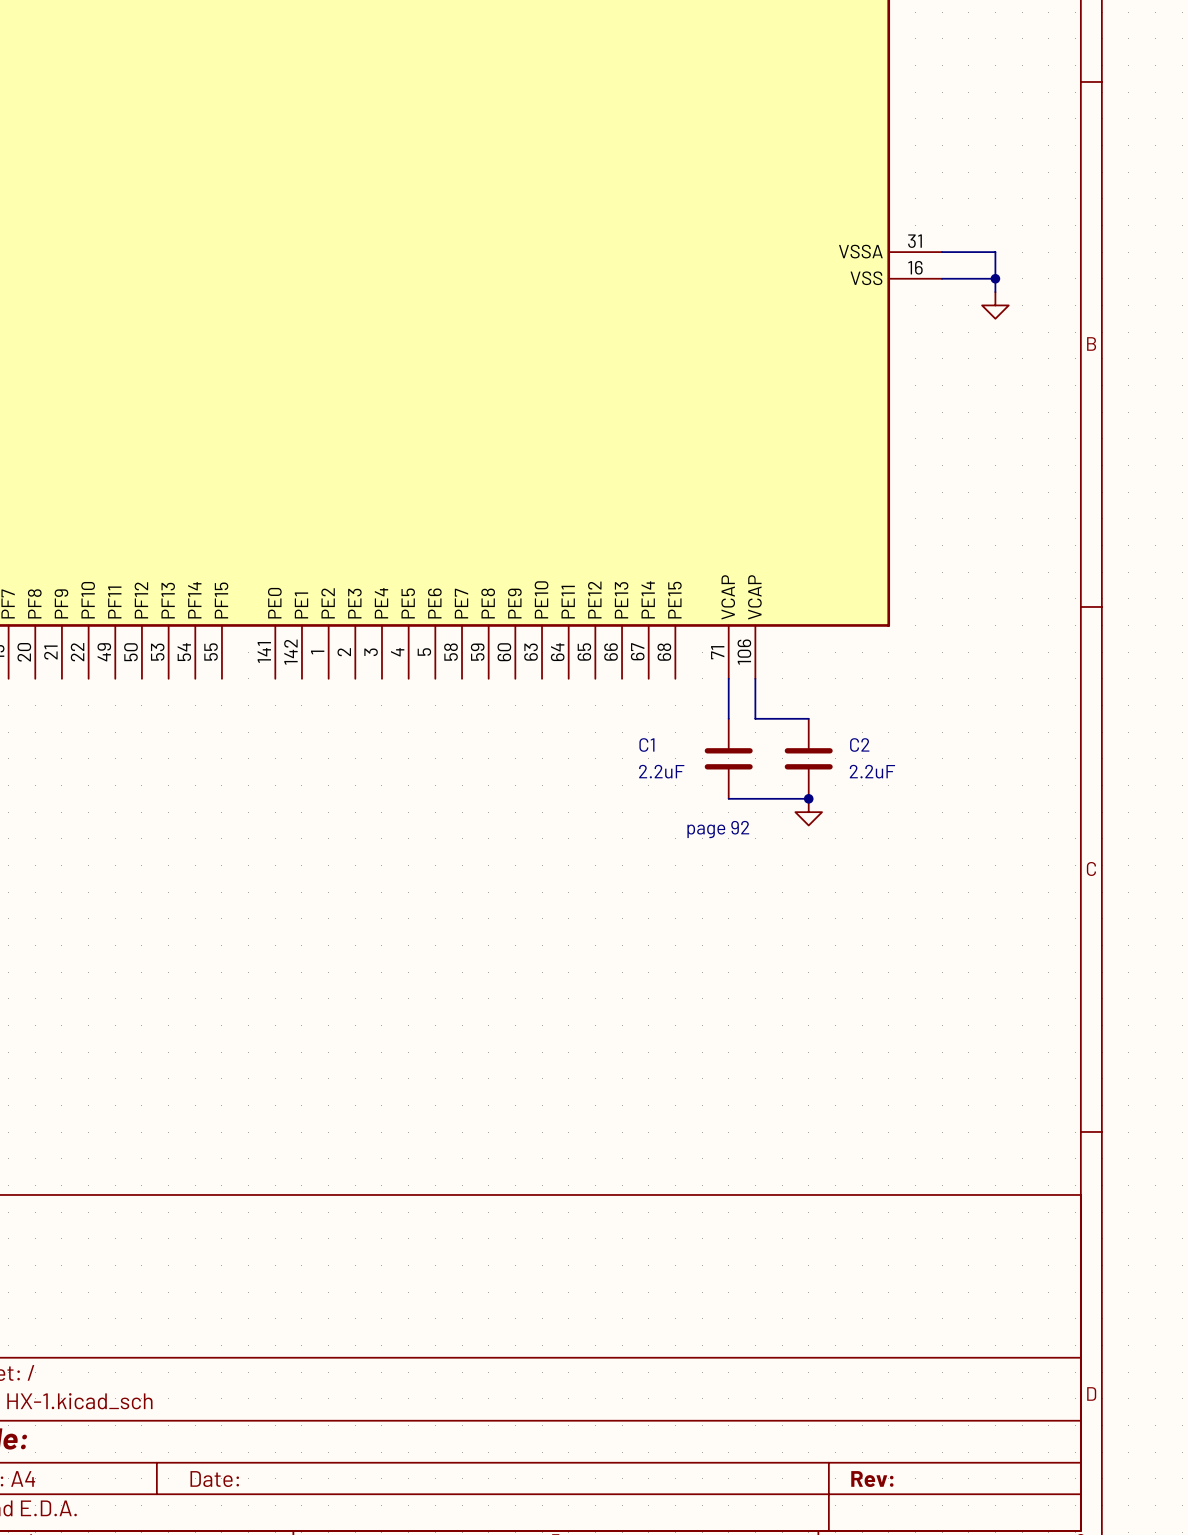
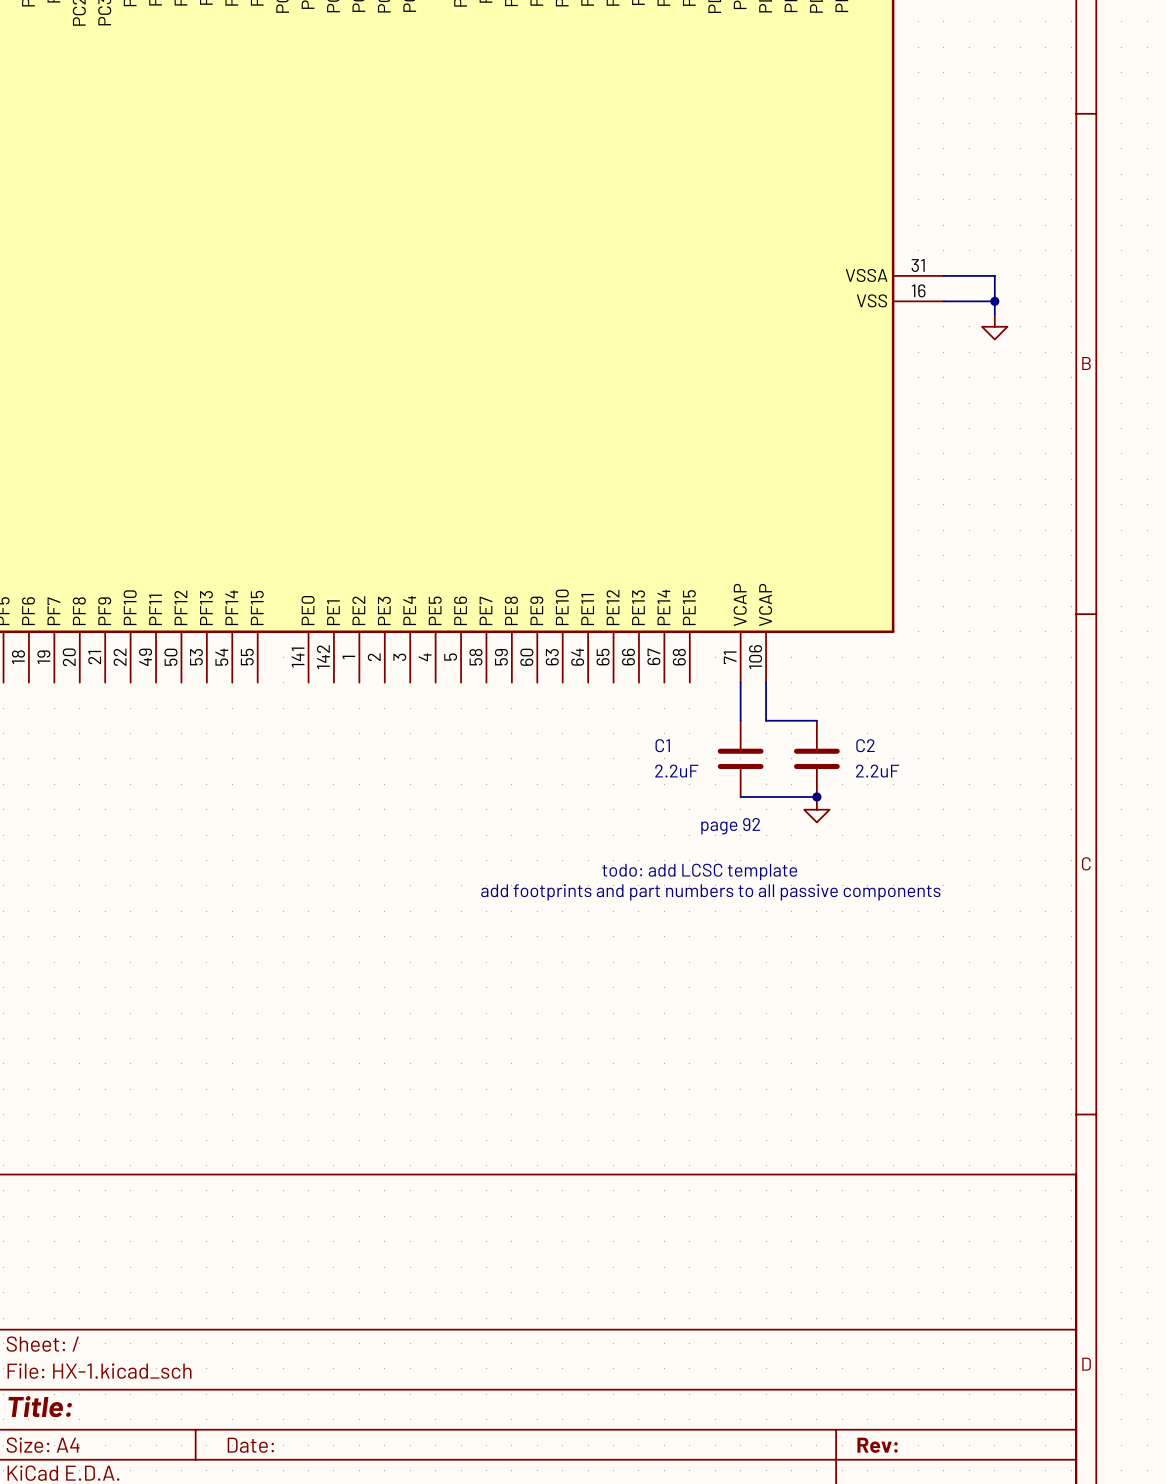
text: none -> todo: add LCSC template (699, 871)
text: none -> add footprints and part numbers to all passive components (710, 892)

